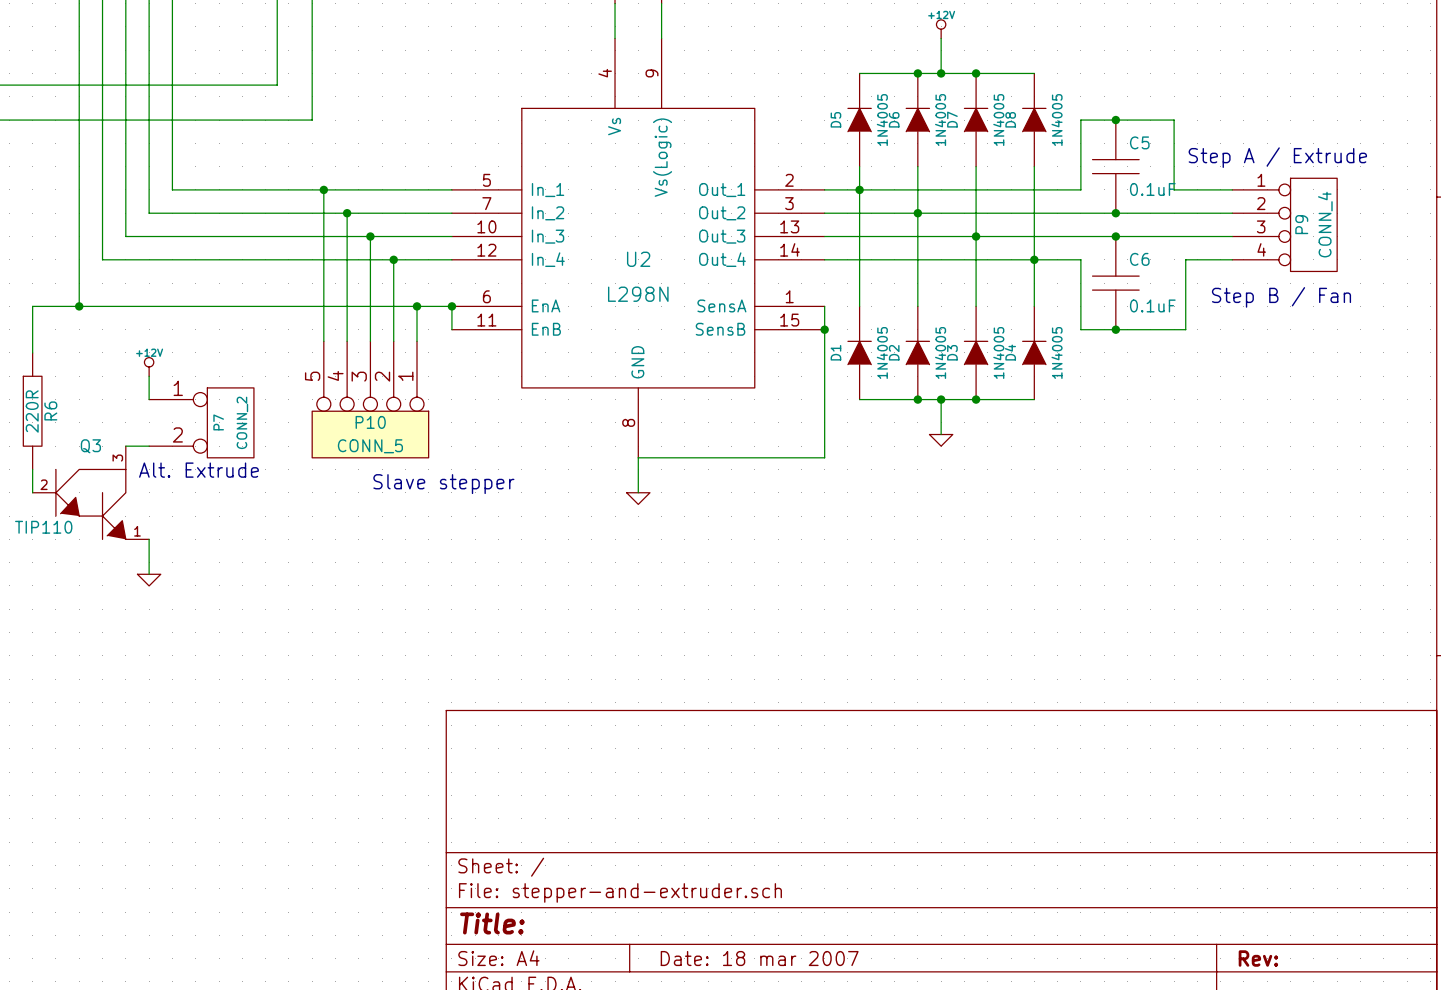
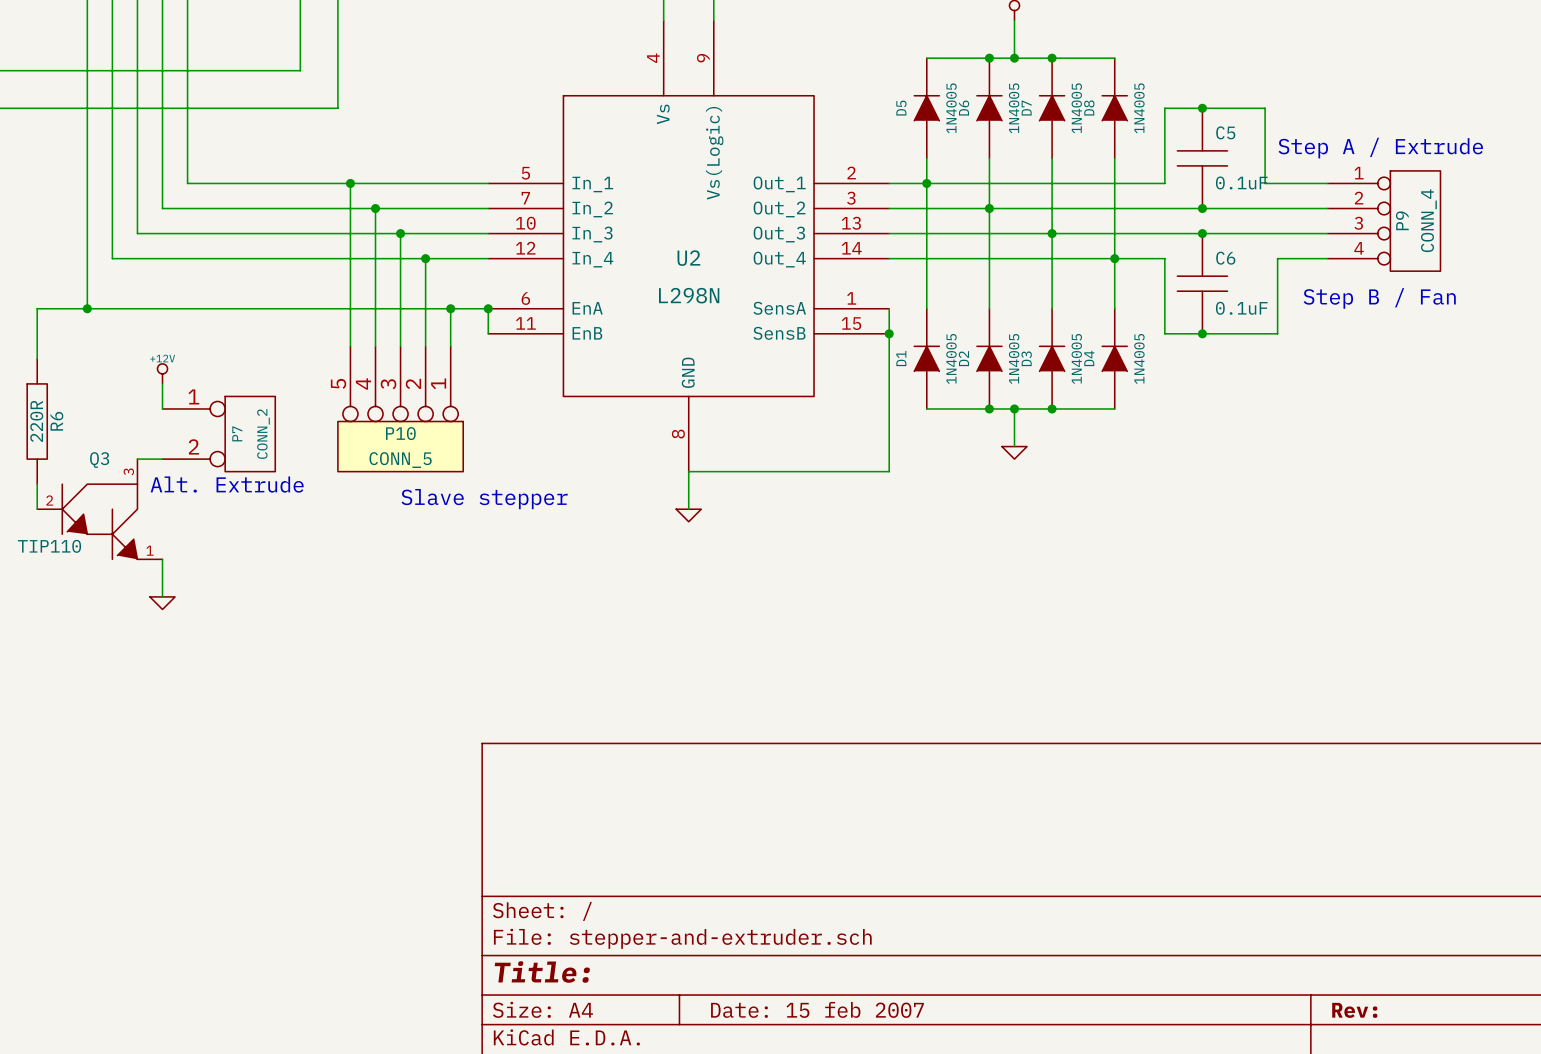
title block: Date: 18 mar 2007 (759, 958) -> Date: 15 feb 2007 (817, 1009)

